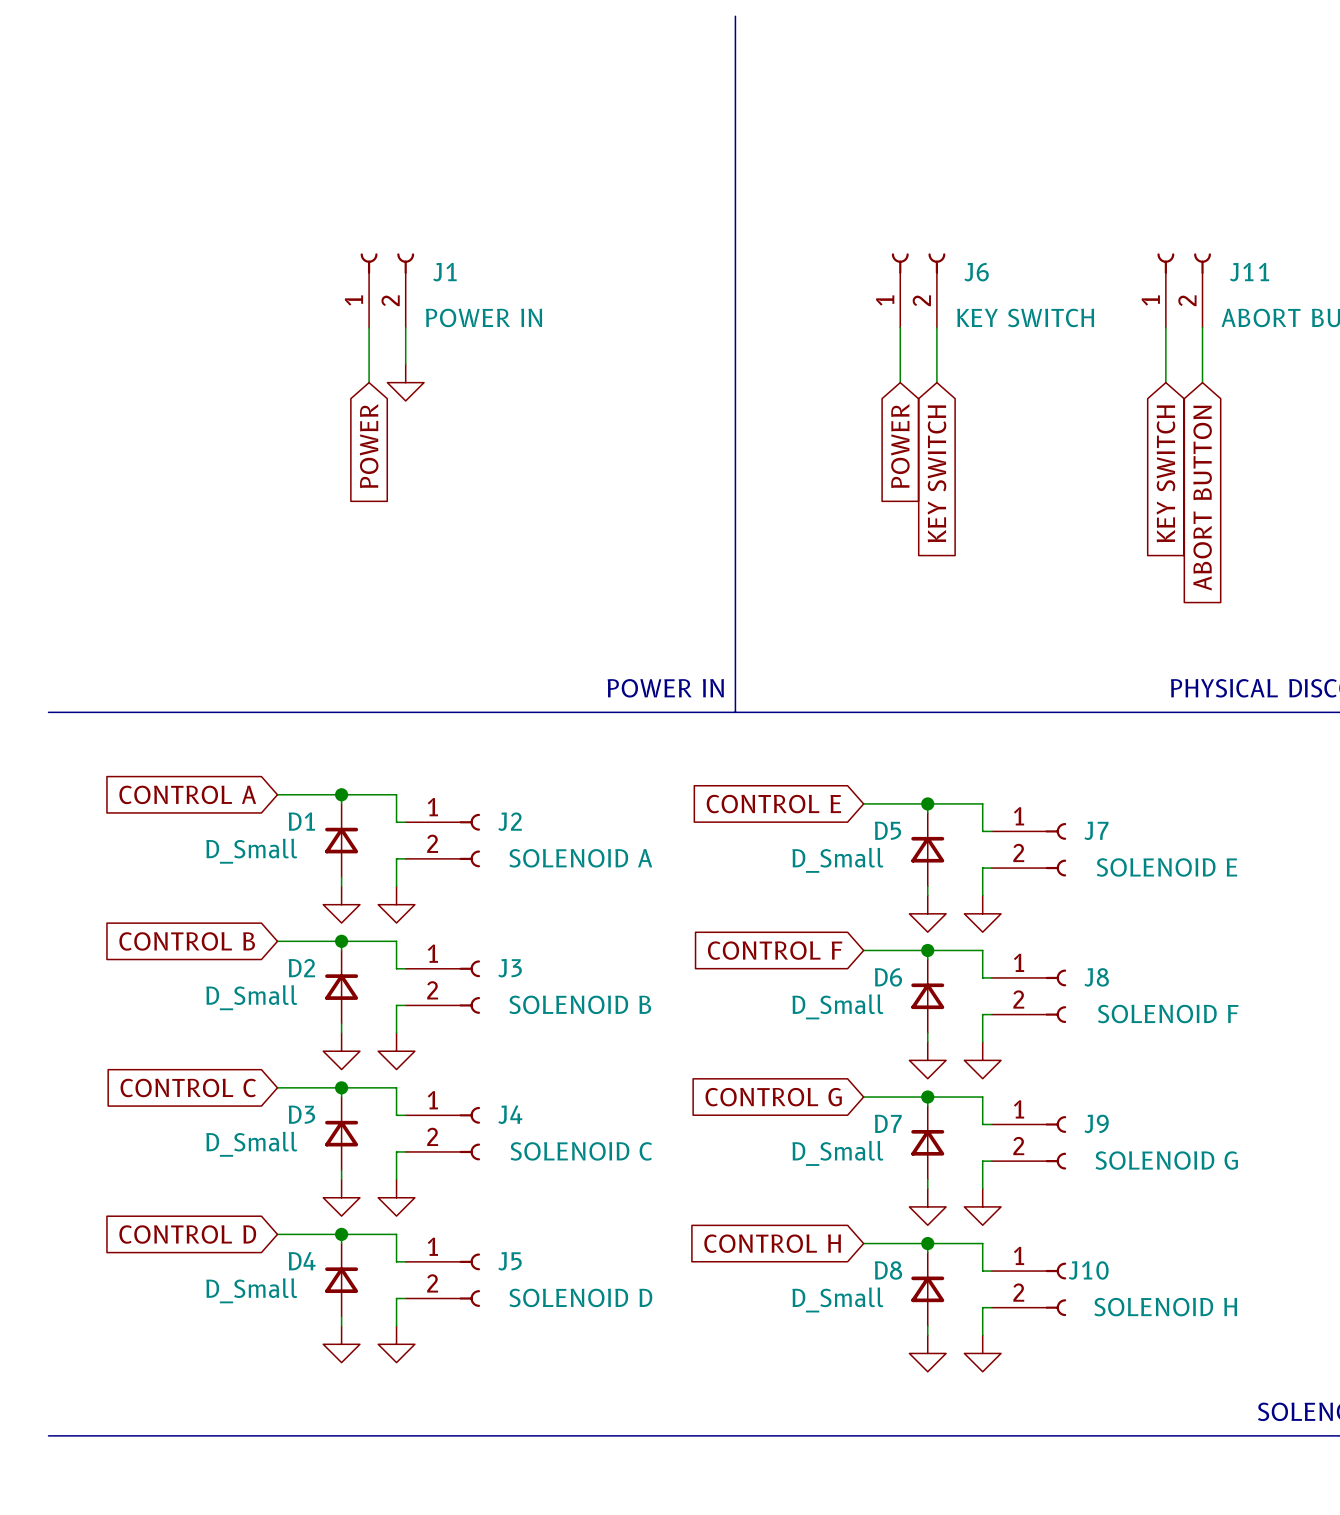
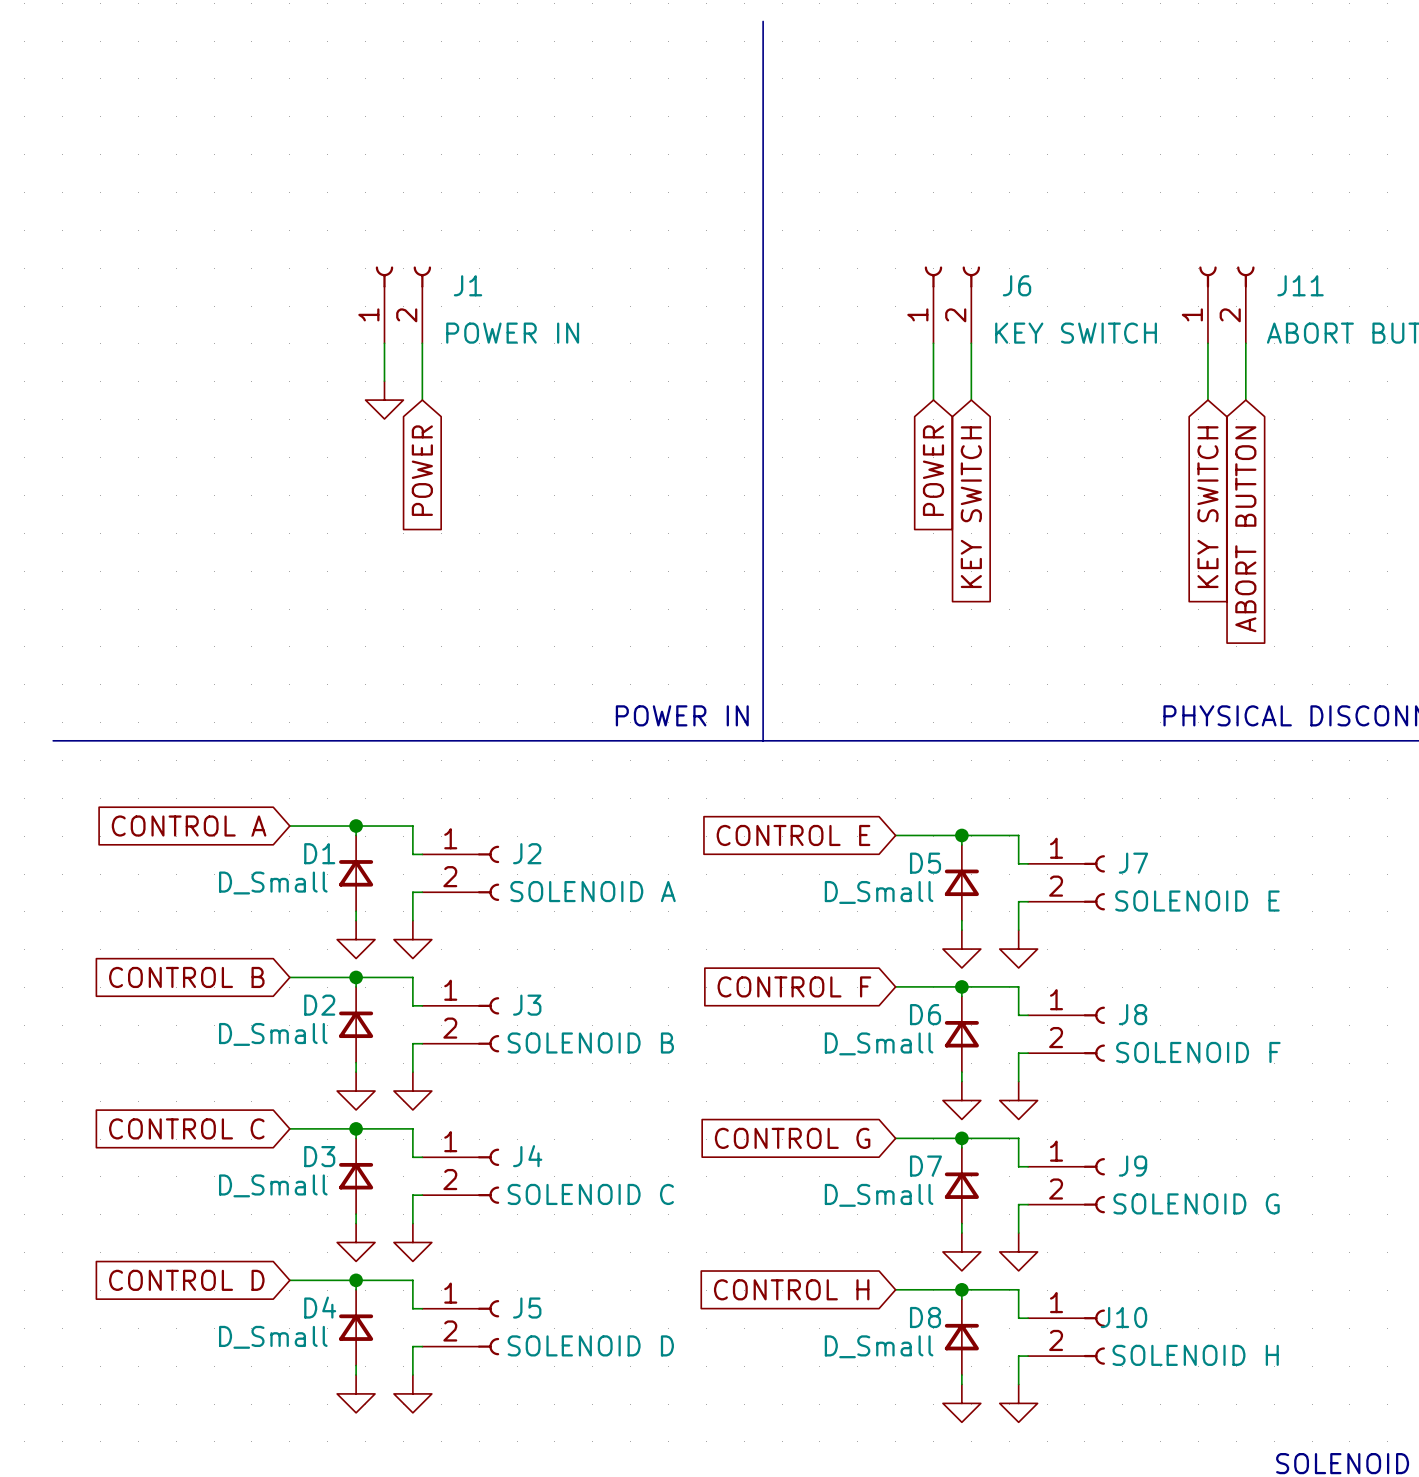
power symbol position: (405, 382) -> (384, 400)
global label position: POWER (369, 446) -> POWER (422, 470)

